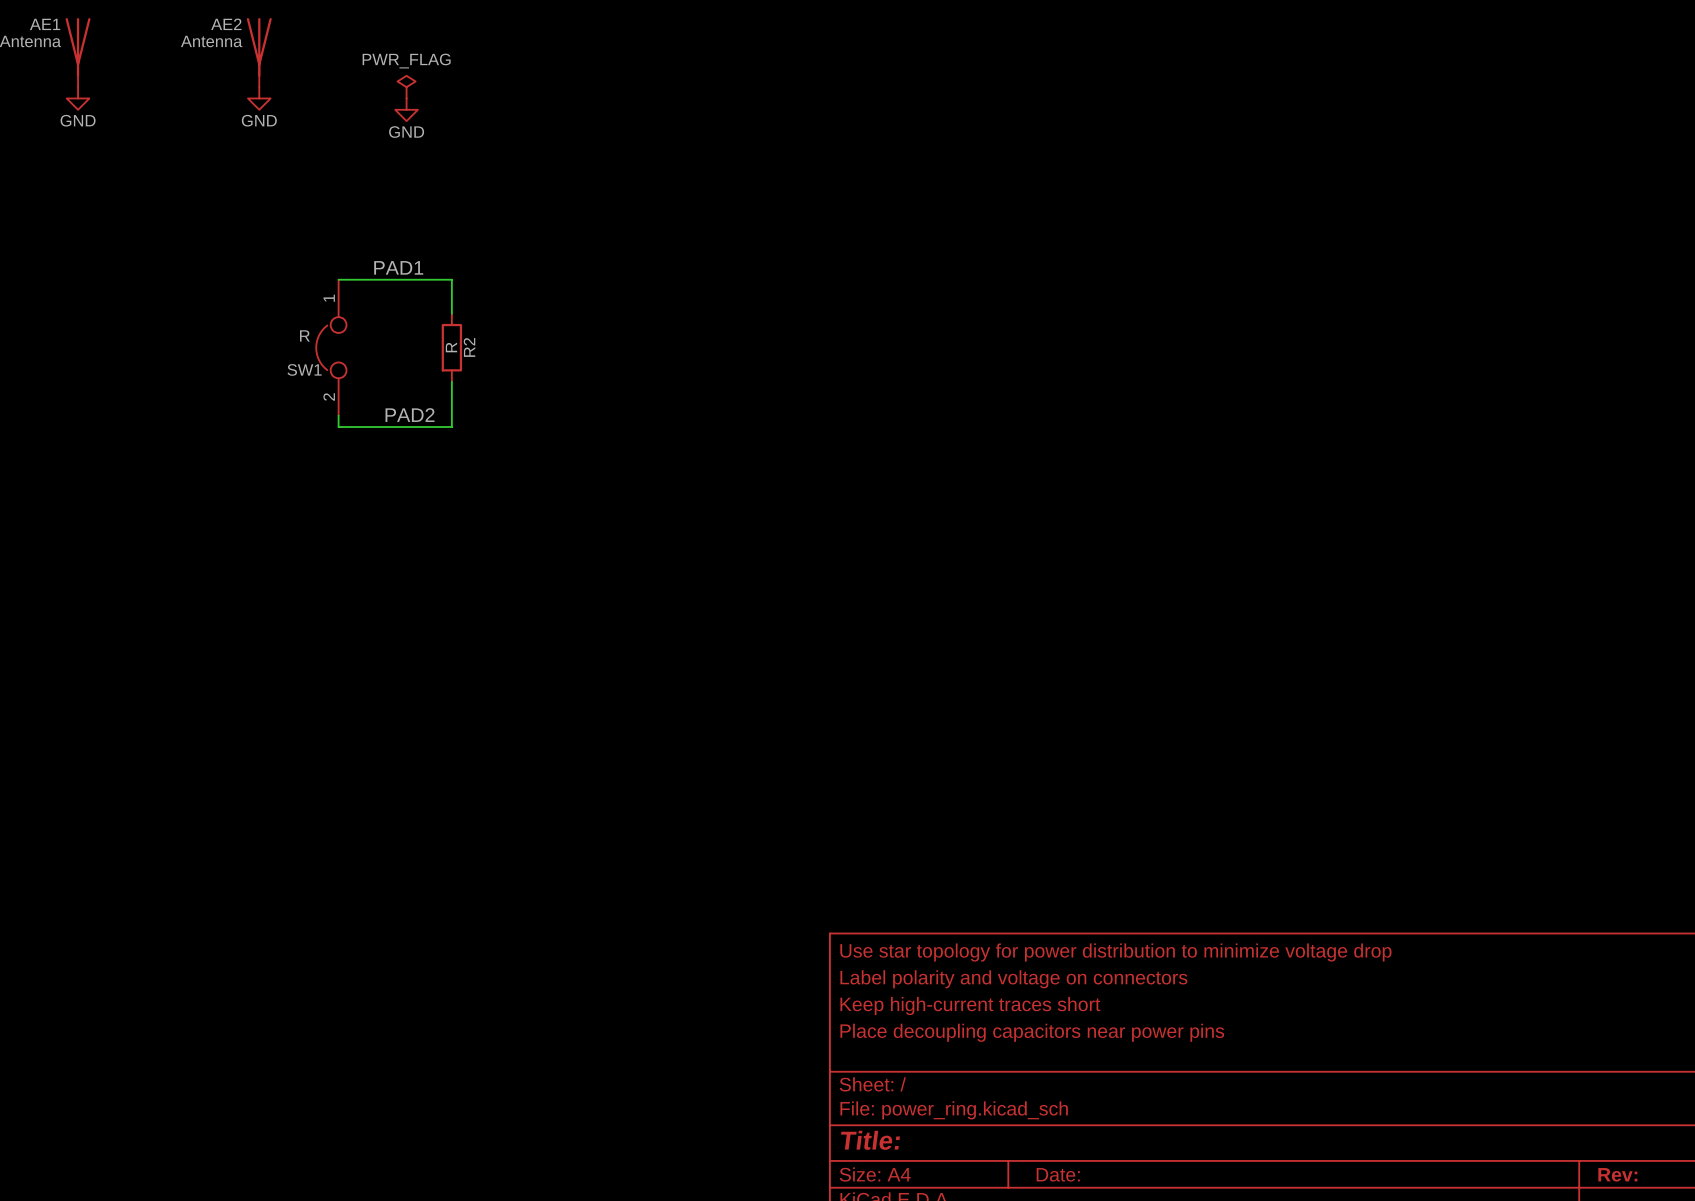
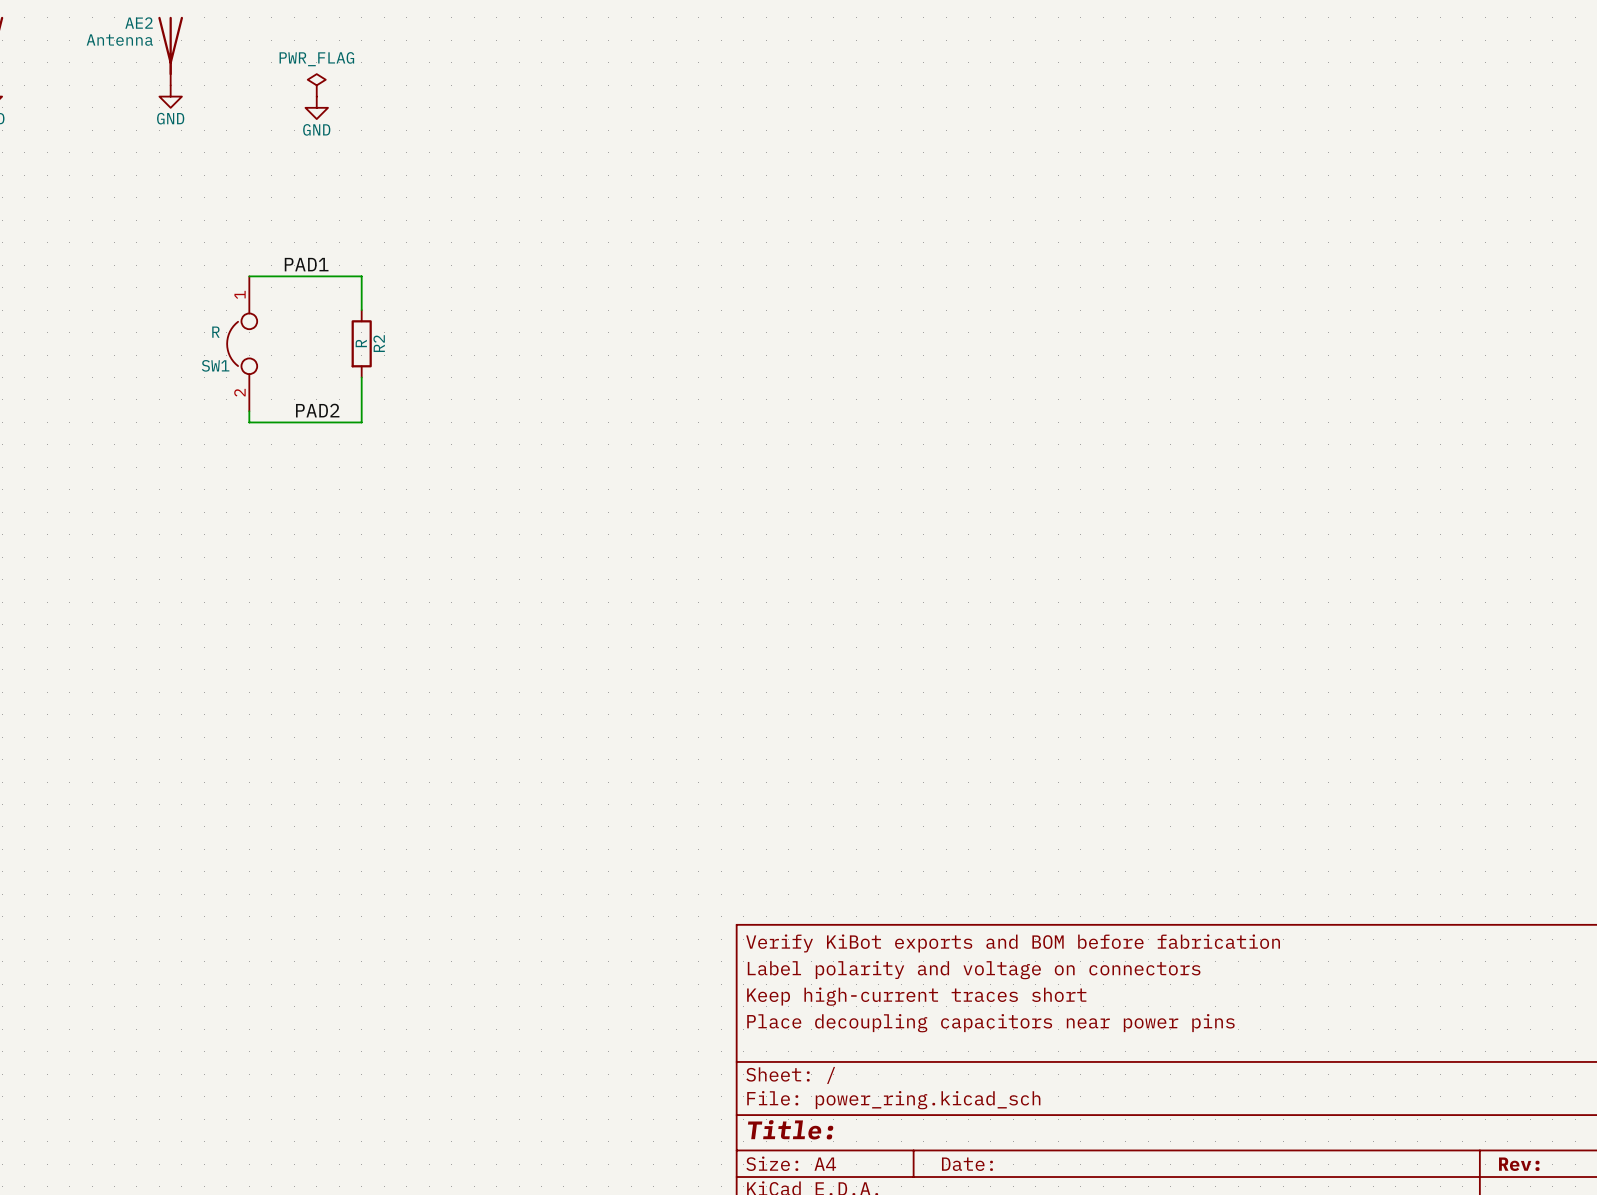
title block: Use star topology for power distribution to minimize voltage drop (1115, 952) -> Verify KiBot exports and BOM before fabrication (1013, 943)

